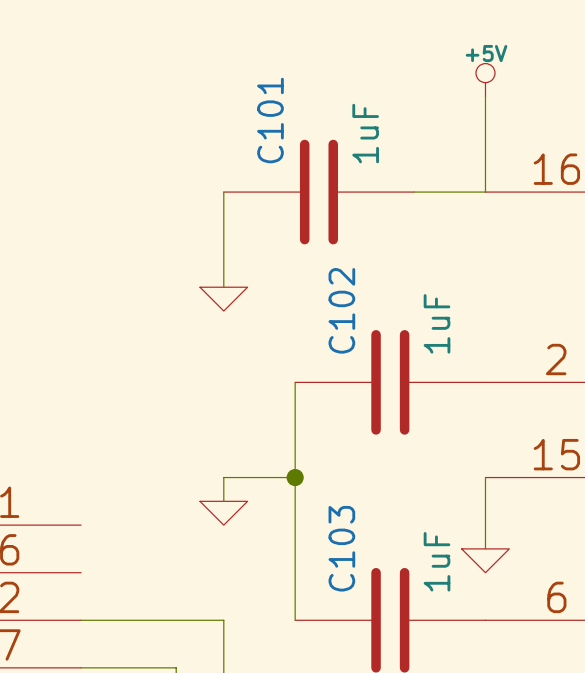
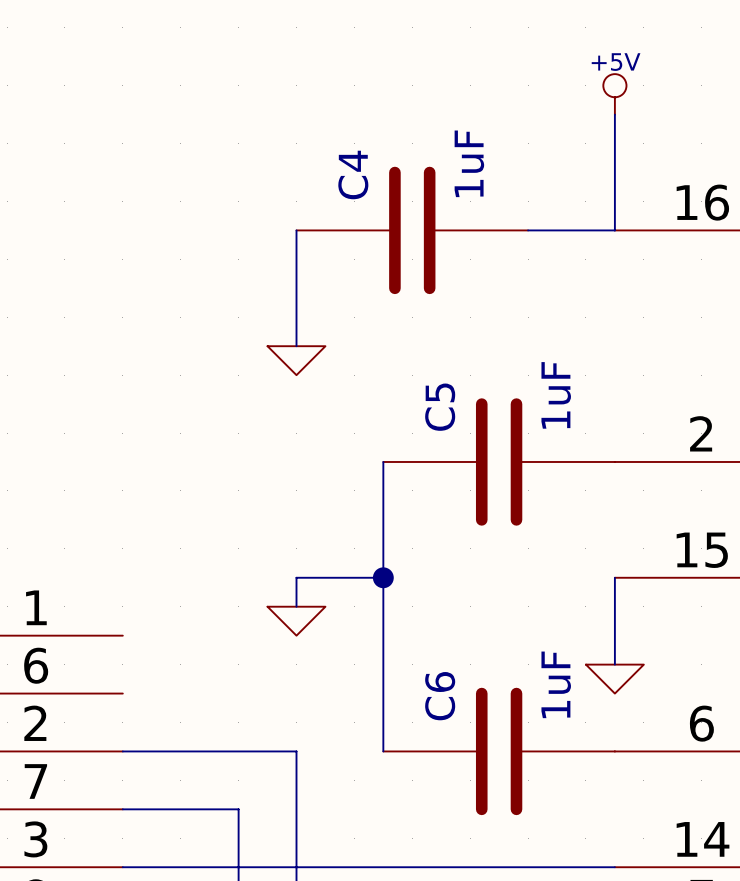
C101 name: C101 (270, 120) -> C4 (353, 174)
C102 name: C102 (341, 310) -> C5 (440, 407)
C103 name: C103 (341, 548) -> C6 (440, 696)

